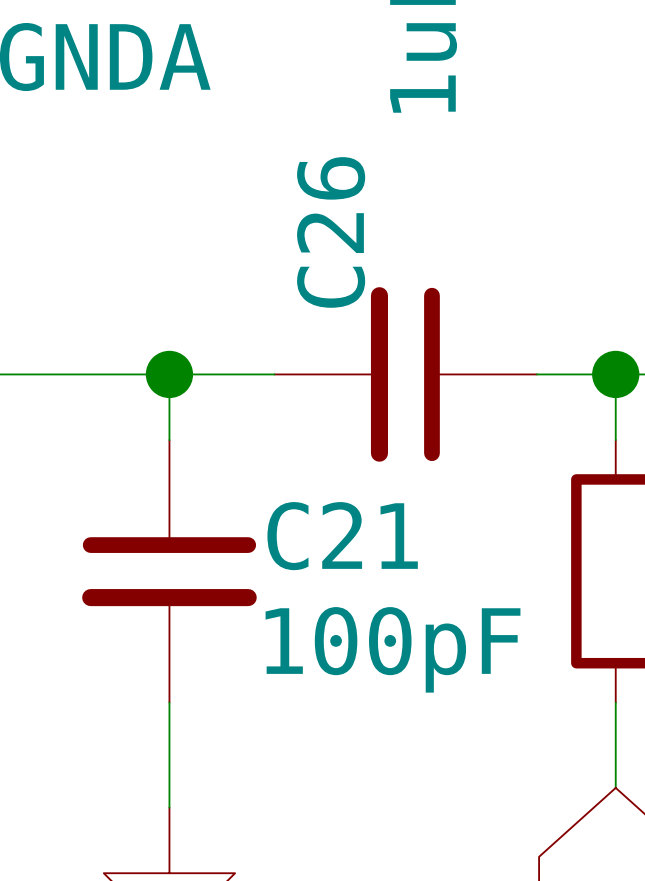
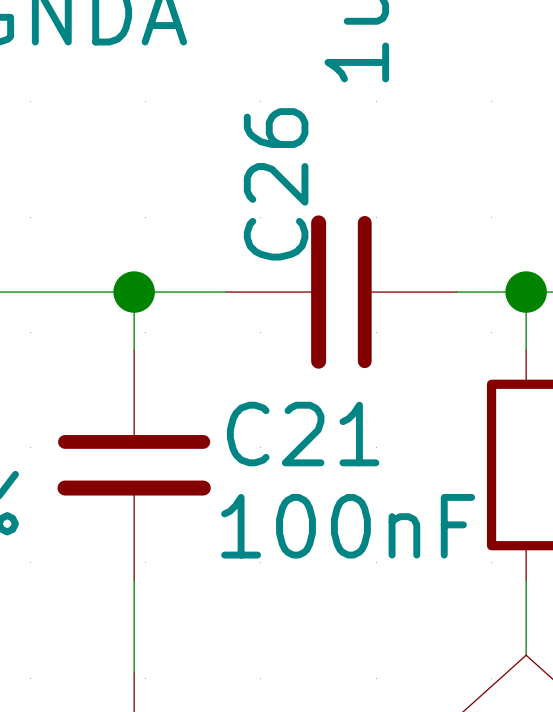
C21 value: 100pF (393, 649) -> 100nF (348, 526)

